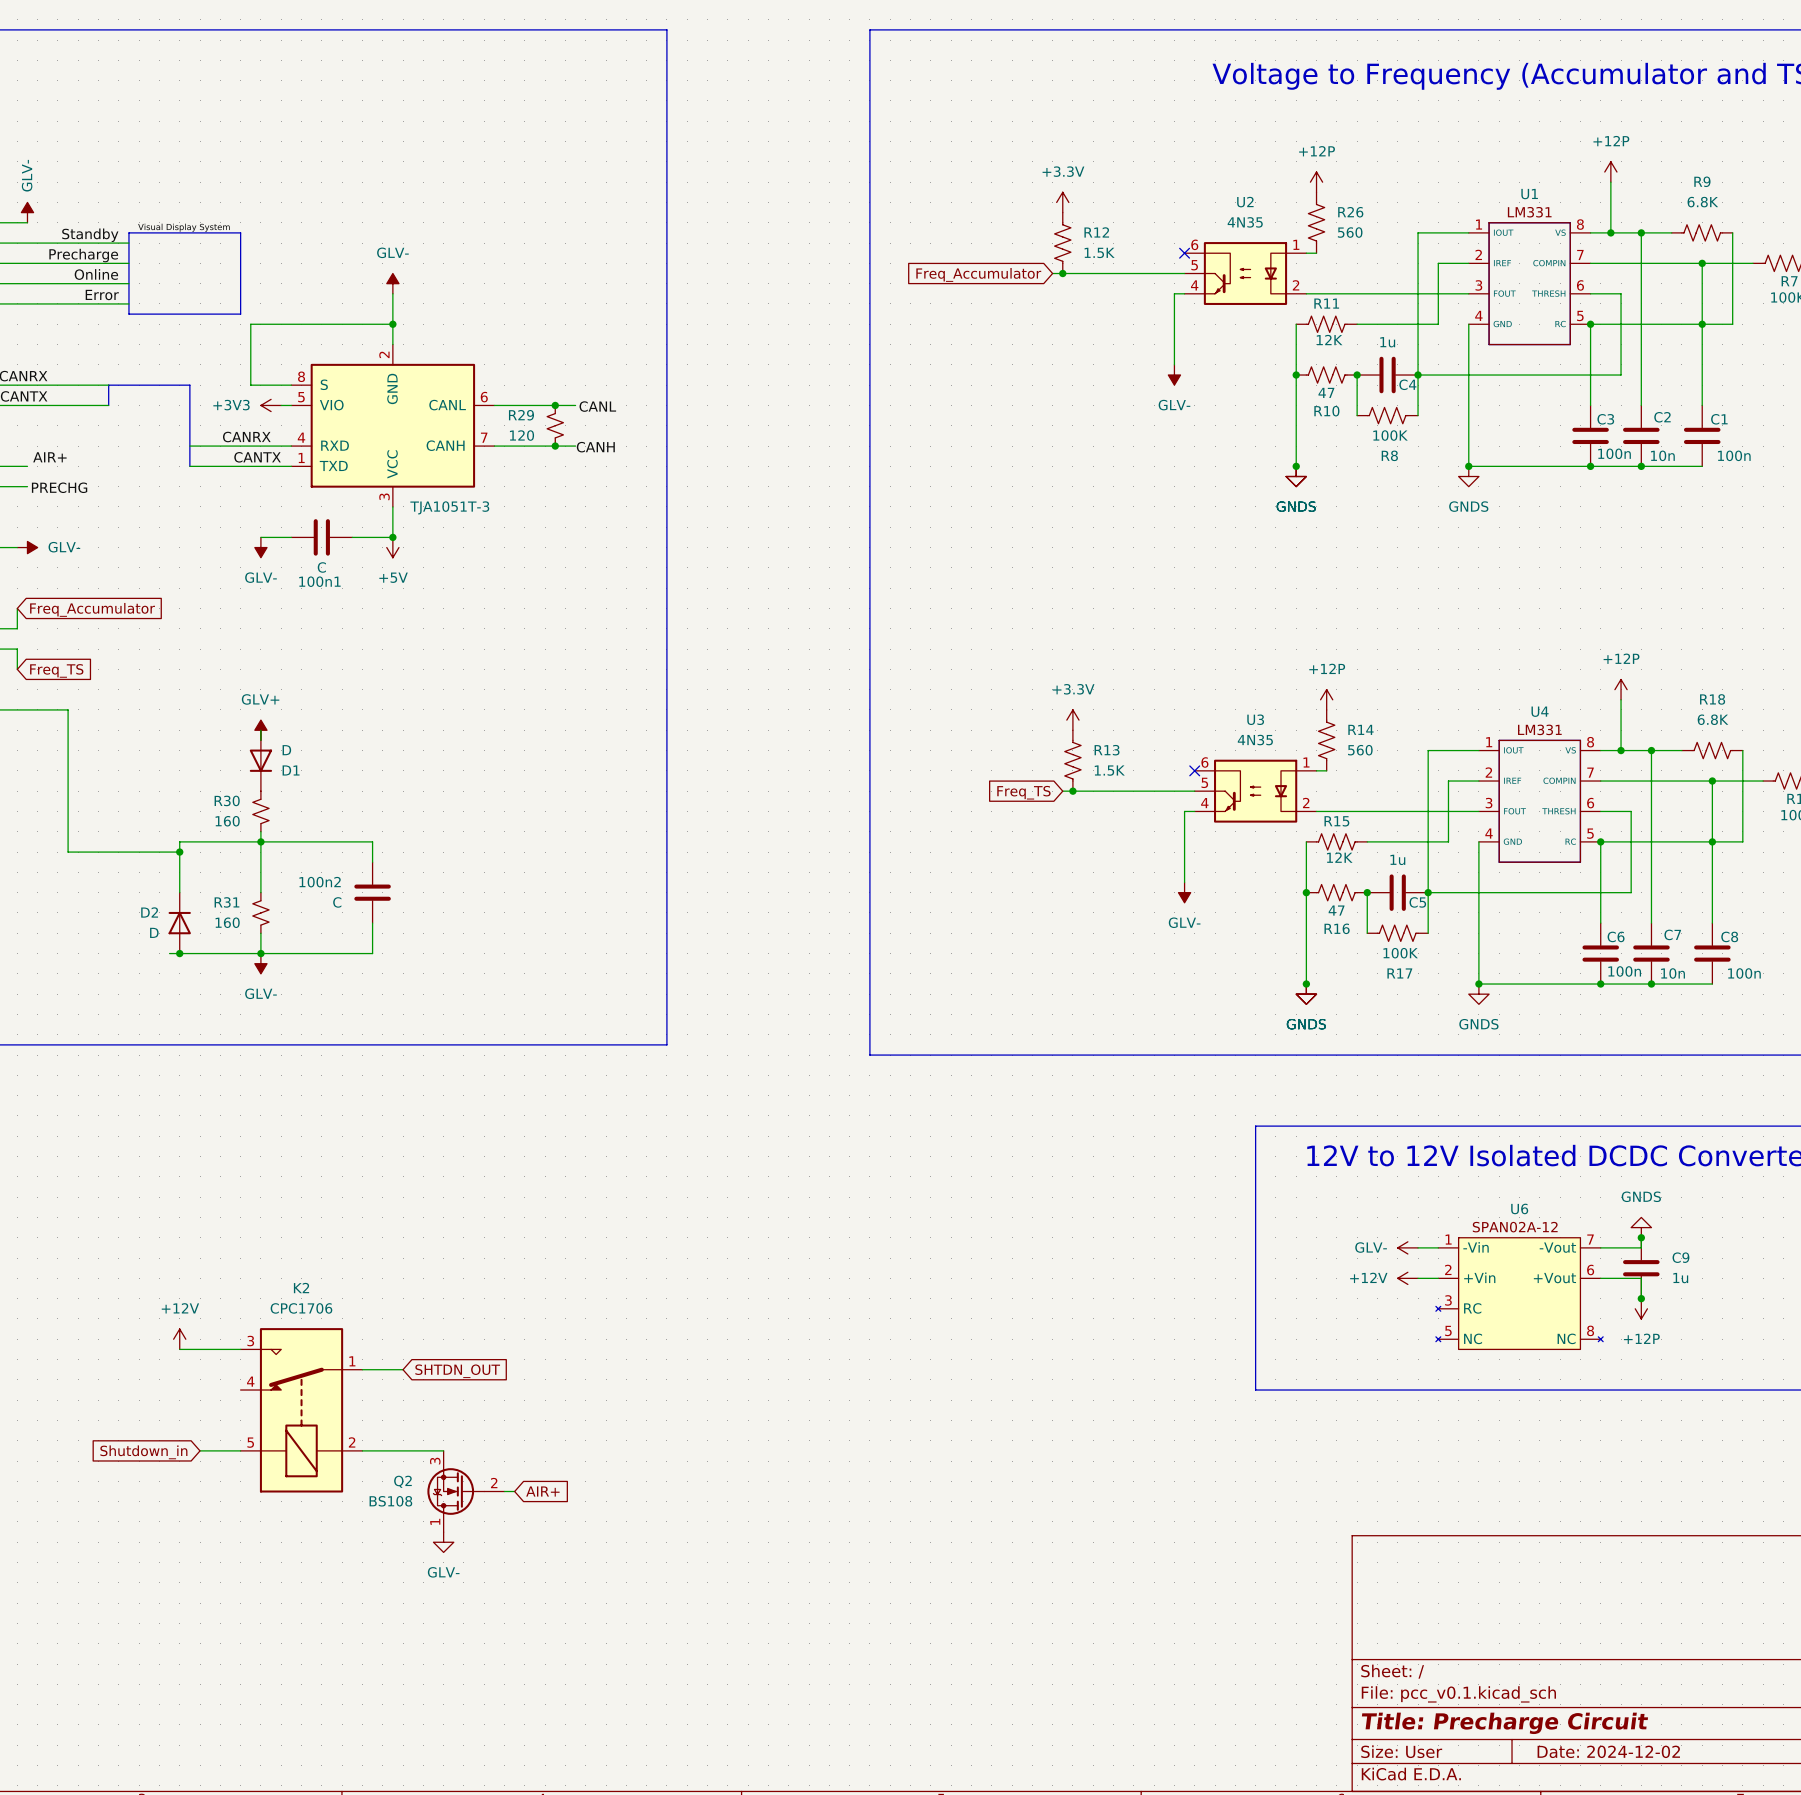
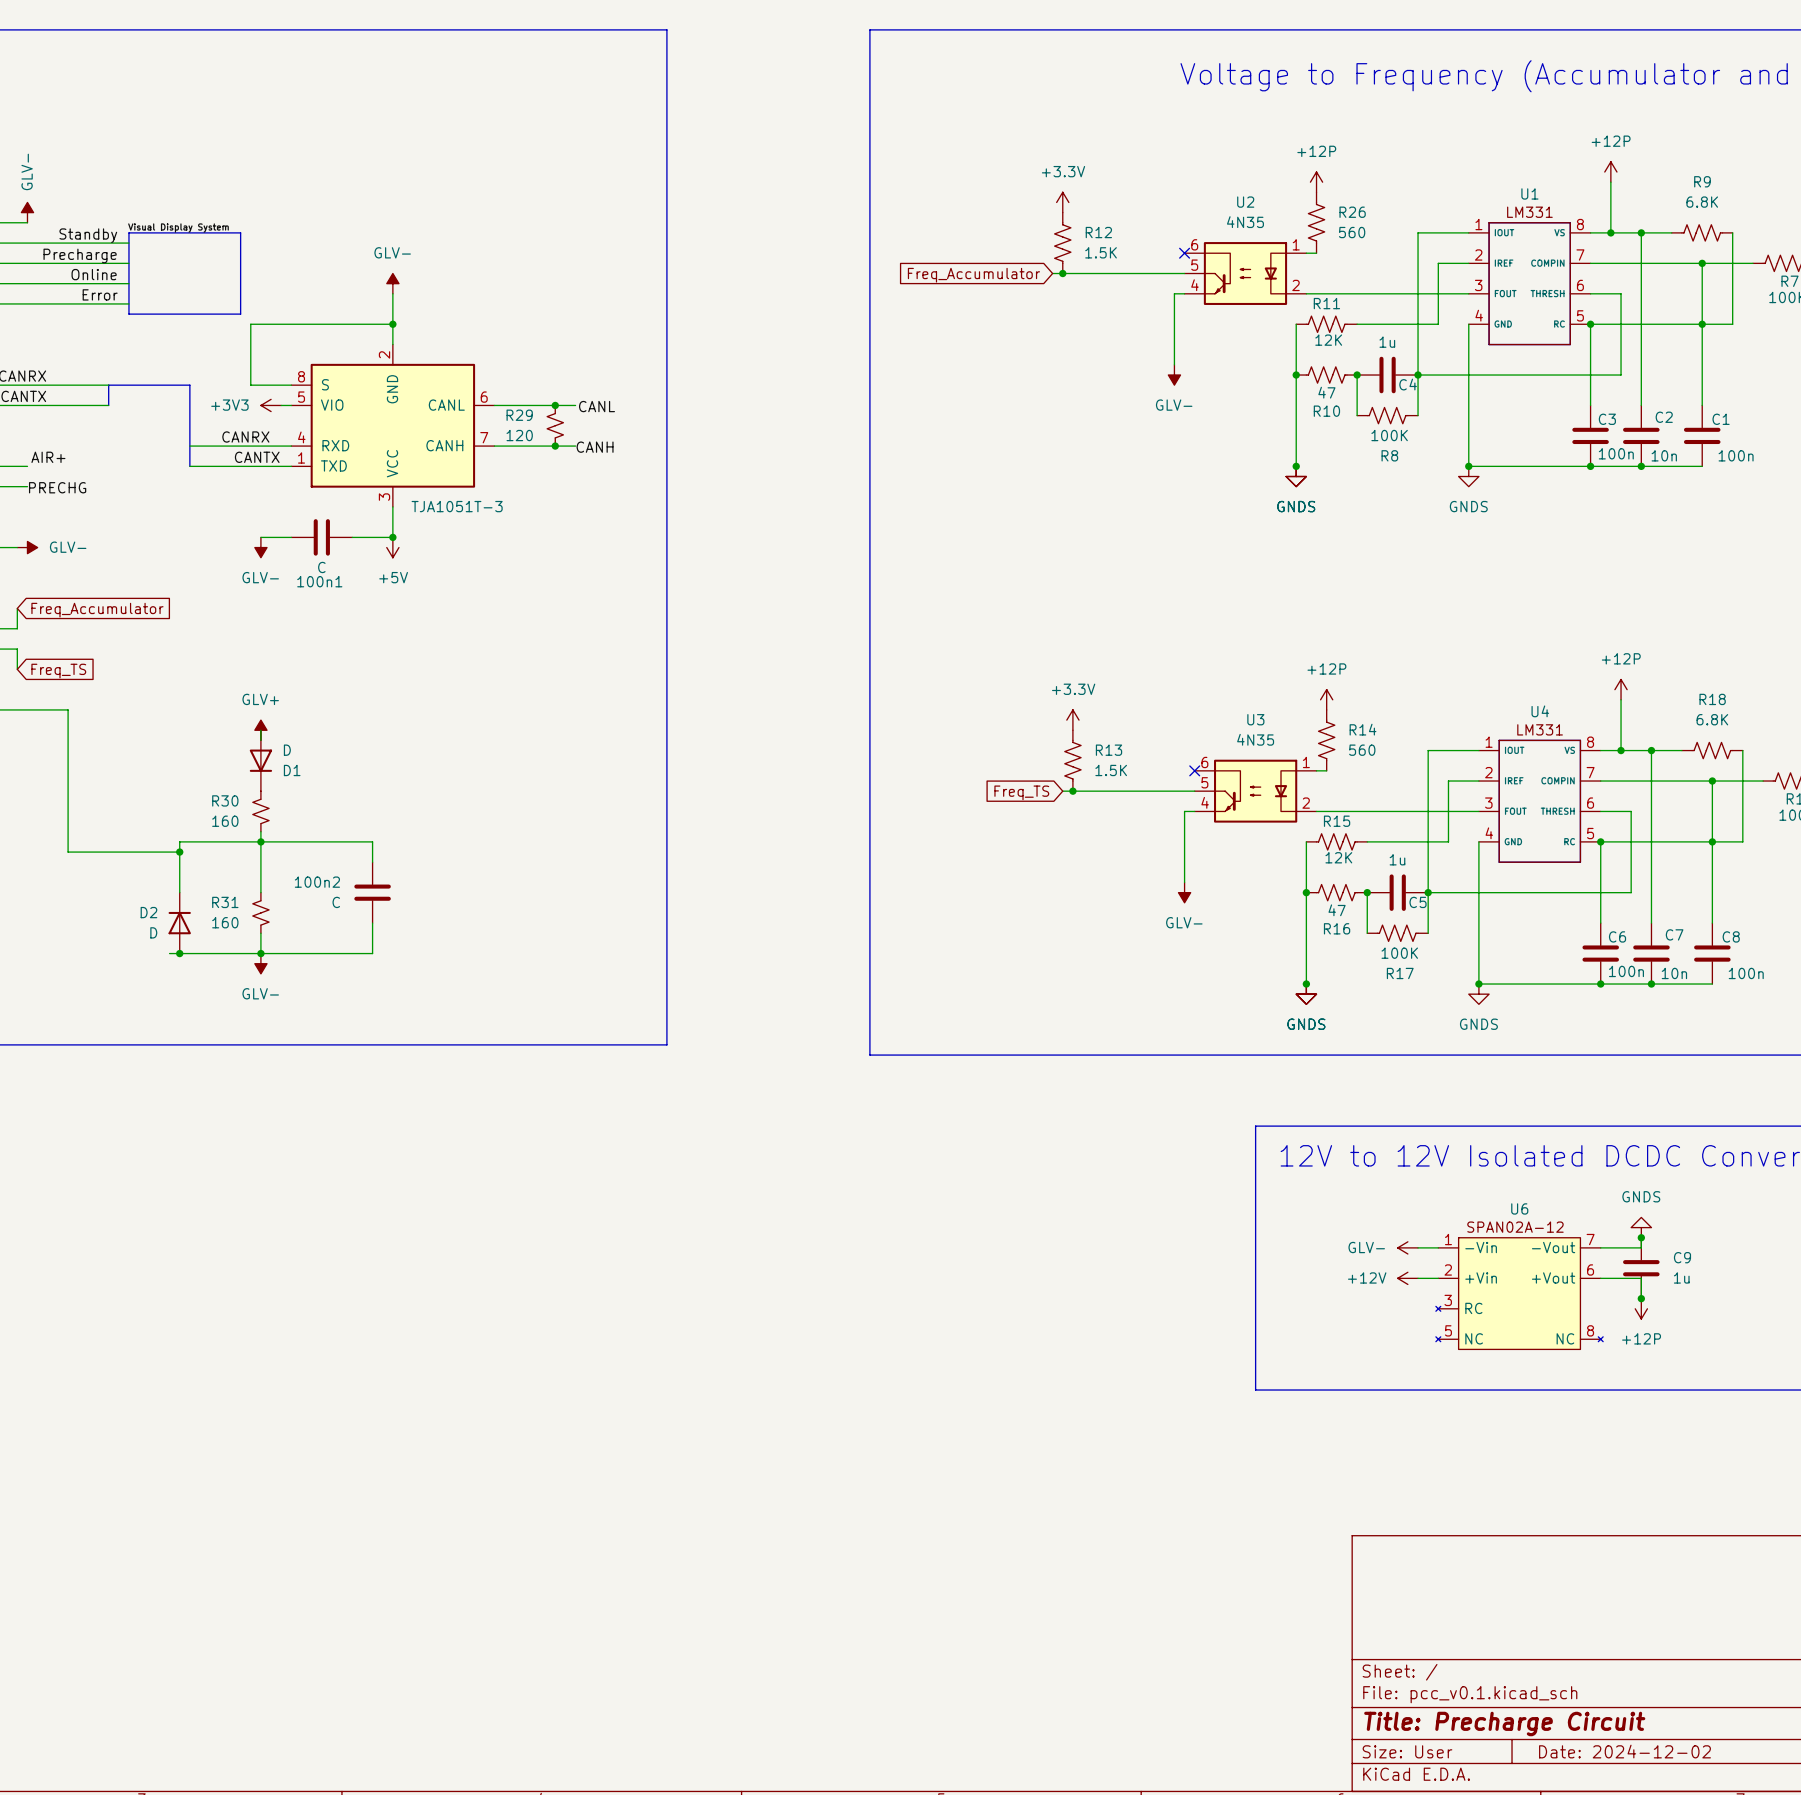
power symbol: +12V (179, 1339) -> none
wire: (179, 1349) (240, 1349) -> none
wire: (362, 1369) (403, 1369) -> none
global label: SHTDN_OUT (457, 1371) -> none
K2: CPC1706 (301, 1410) -> none
wire: (200, 1450) (240, 1450) -> none
wire: (362, 1450) (443, 1450) -> none
global label: Shutdown_in (143, 1452) -> none
Q2: BS108 (465, 1491) -> none
wire: (504, 1491) (514, 1491) -> none
global label: AIR+ (542, 1491) -> none
power symbol: GLV- (443, 1542) -> none

